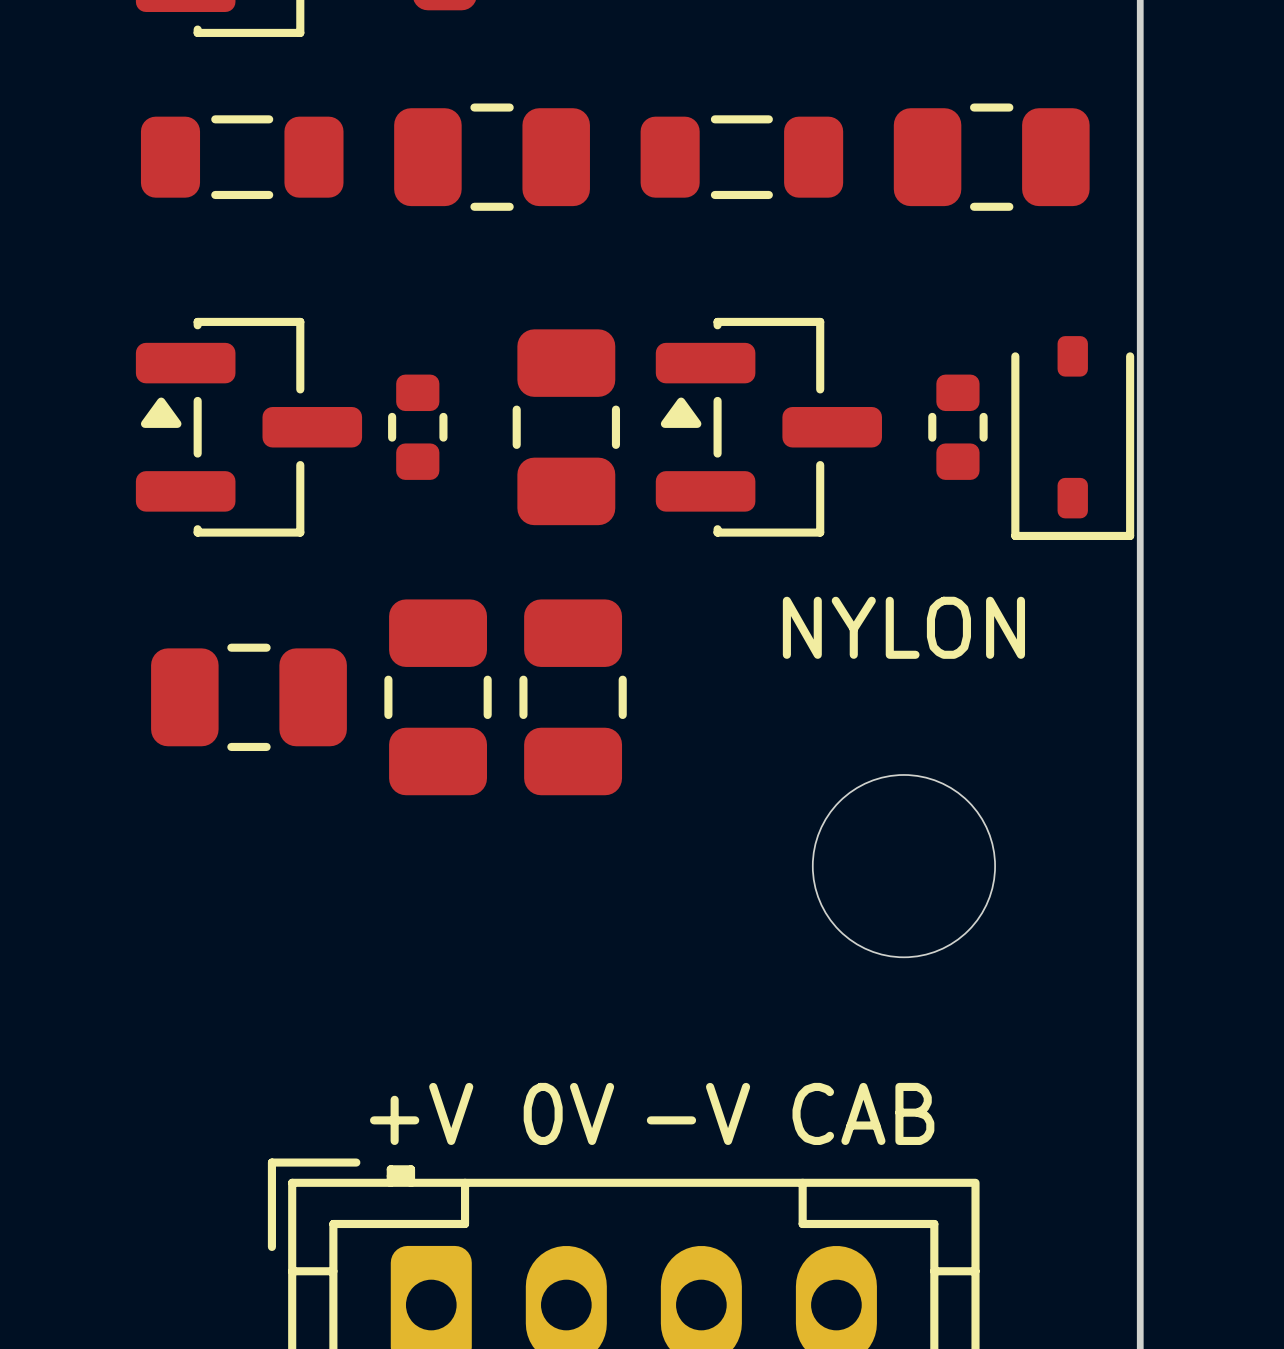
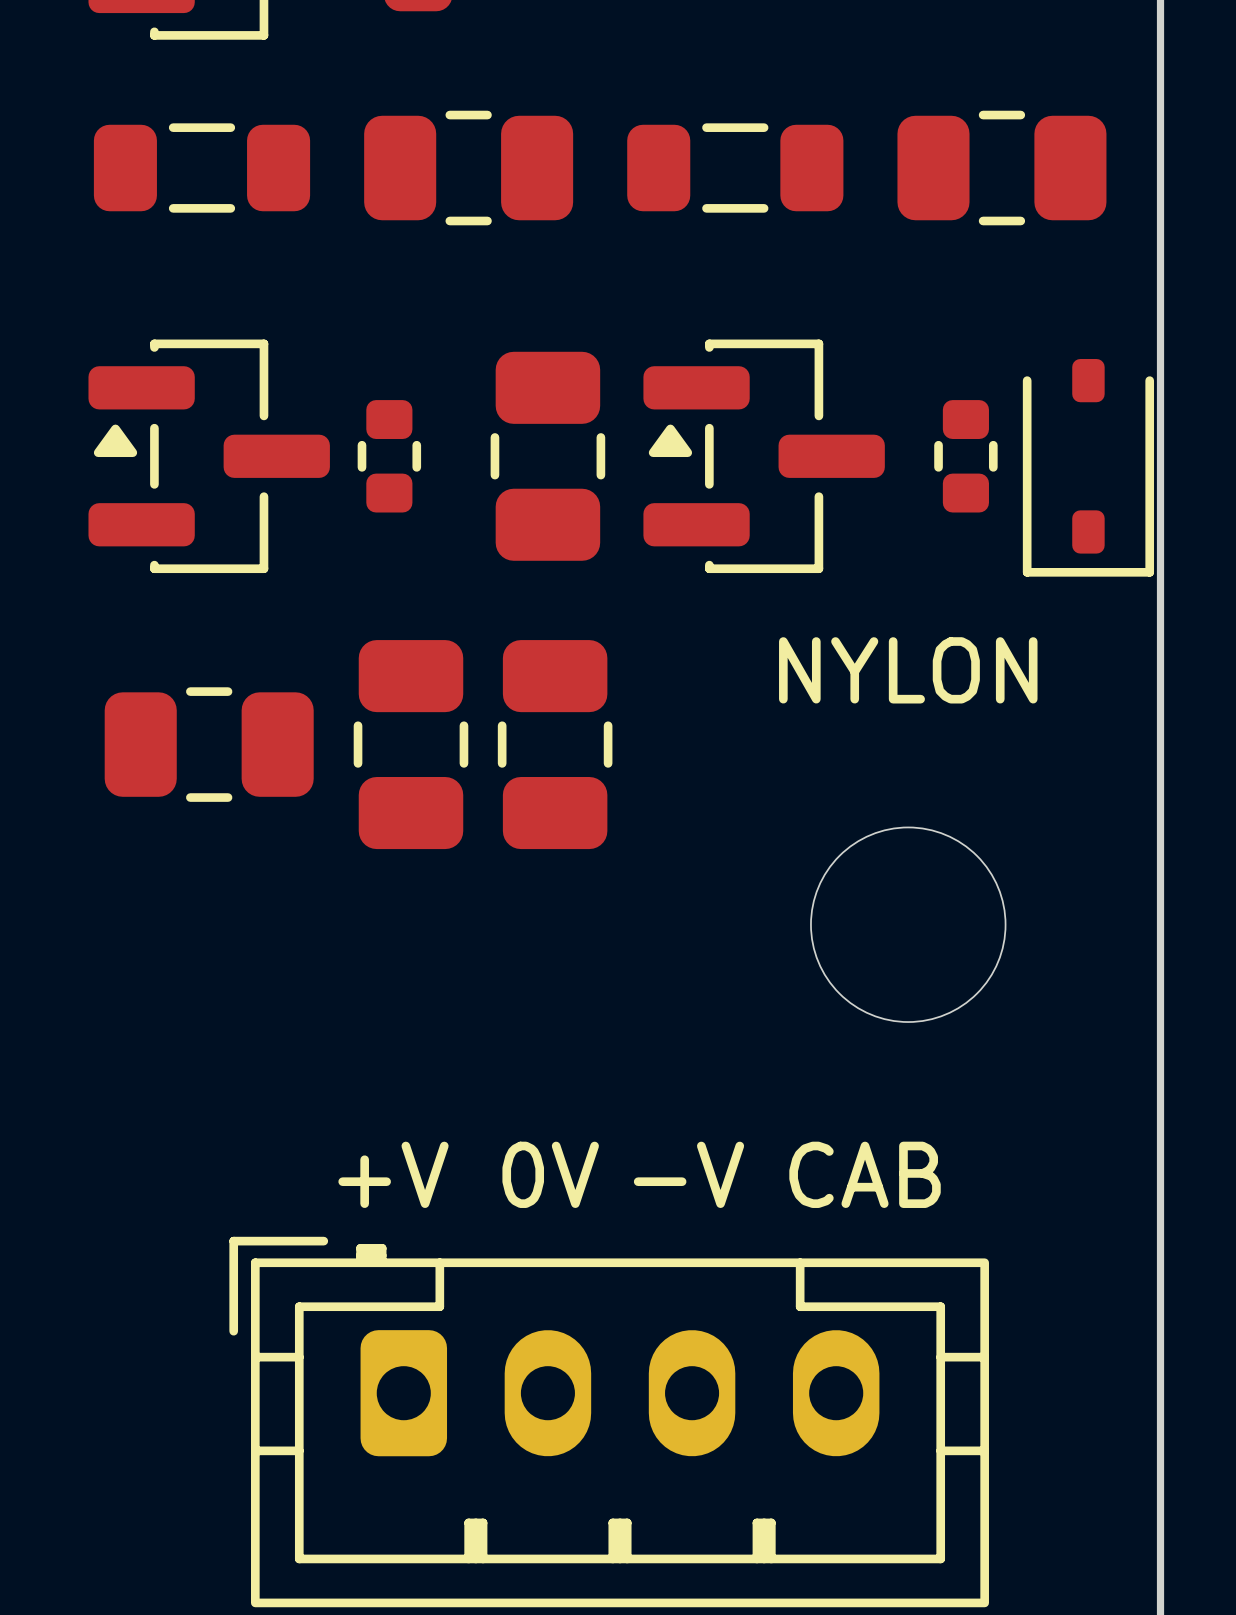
text position: +V (421, 1113) -> +V (393, 1174)
text position: 0V (568, 1113) -> 0V (550, 1174)
text position: -V (698, 1113) -> -V (688, 1174)
text position: CAB (863, 1113) -> CAB (865, 1174)

